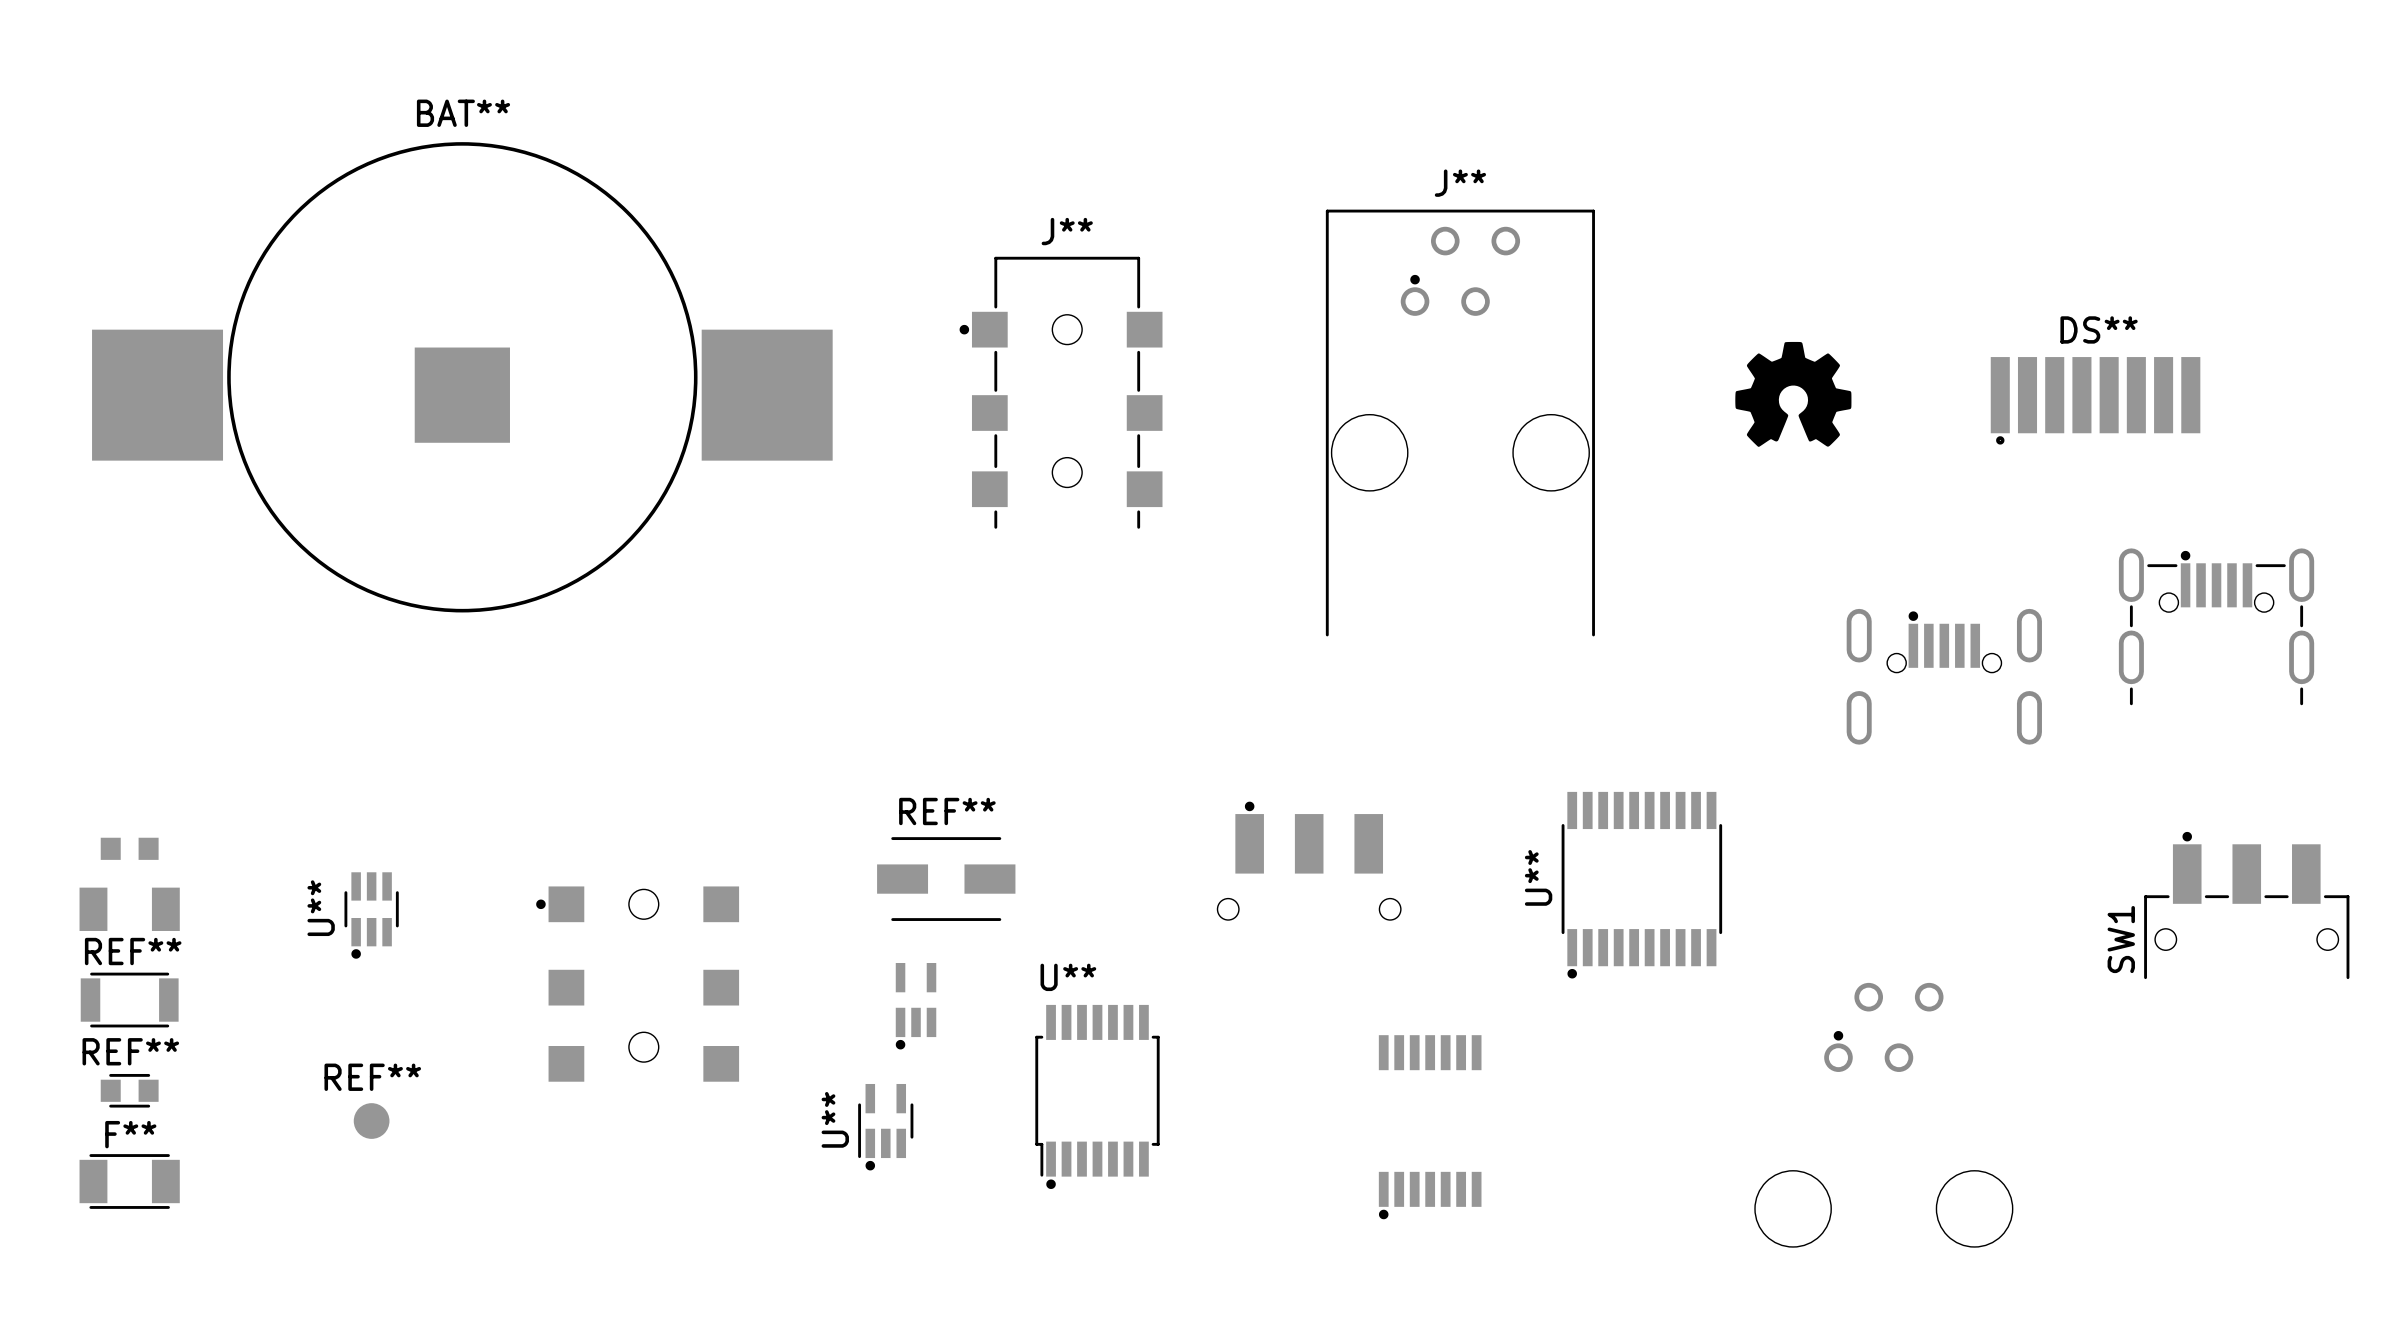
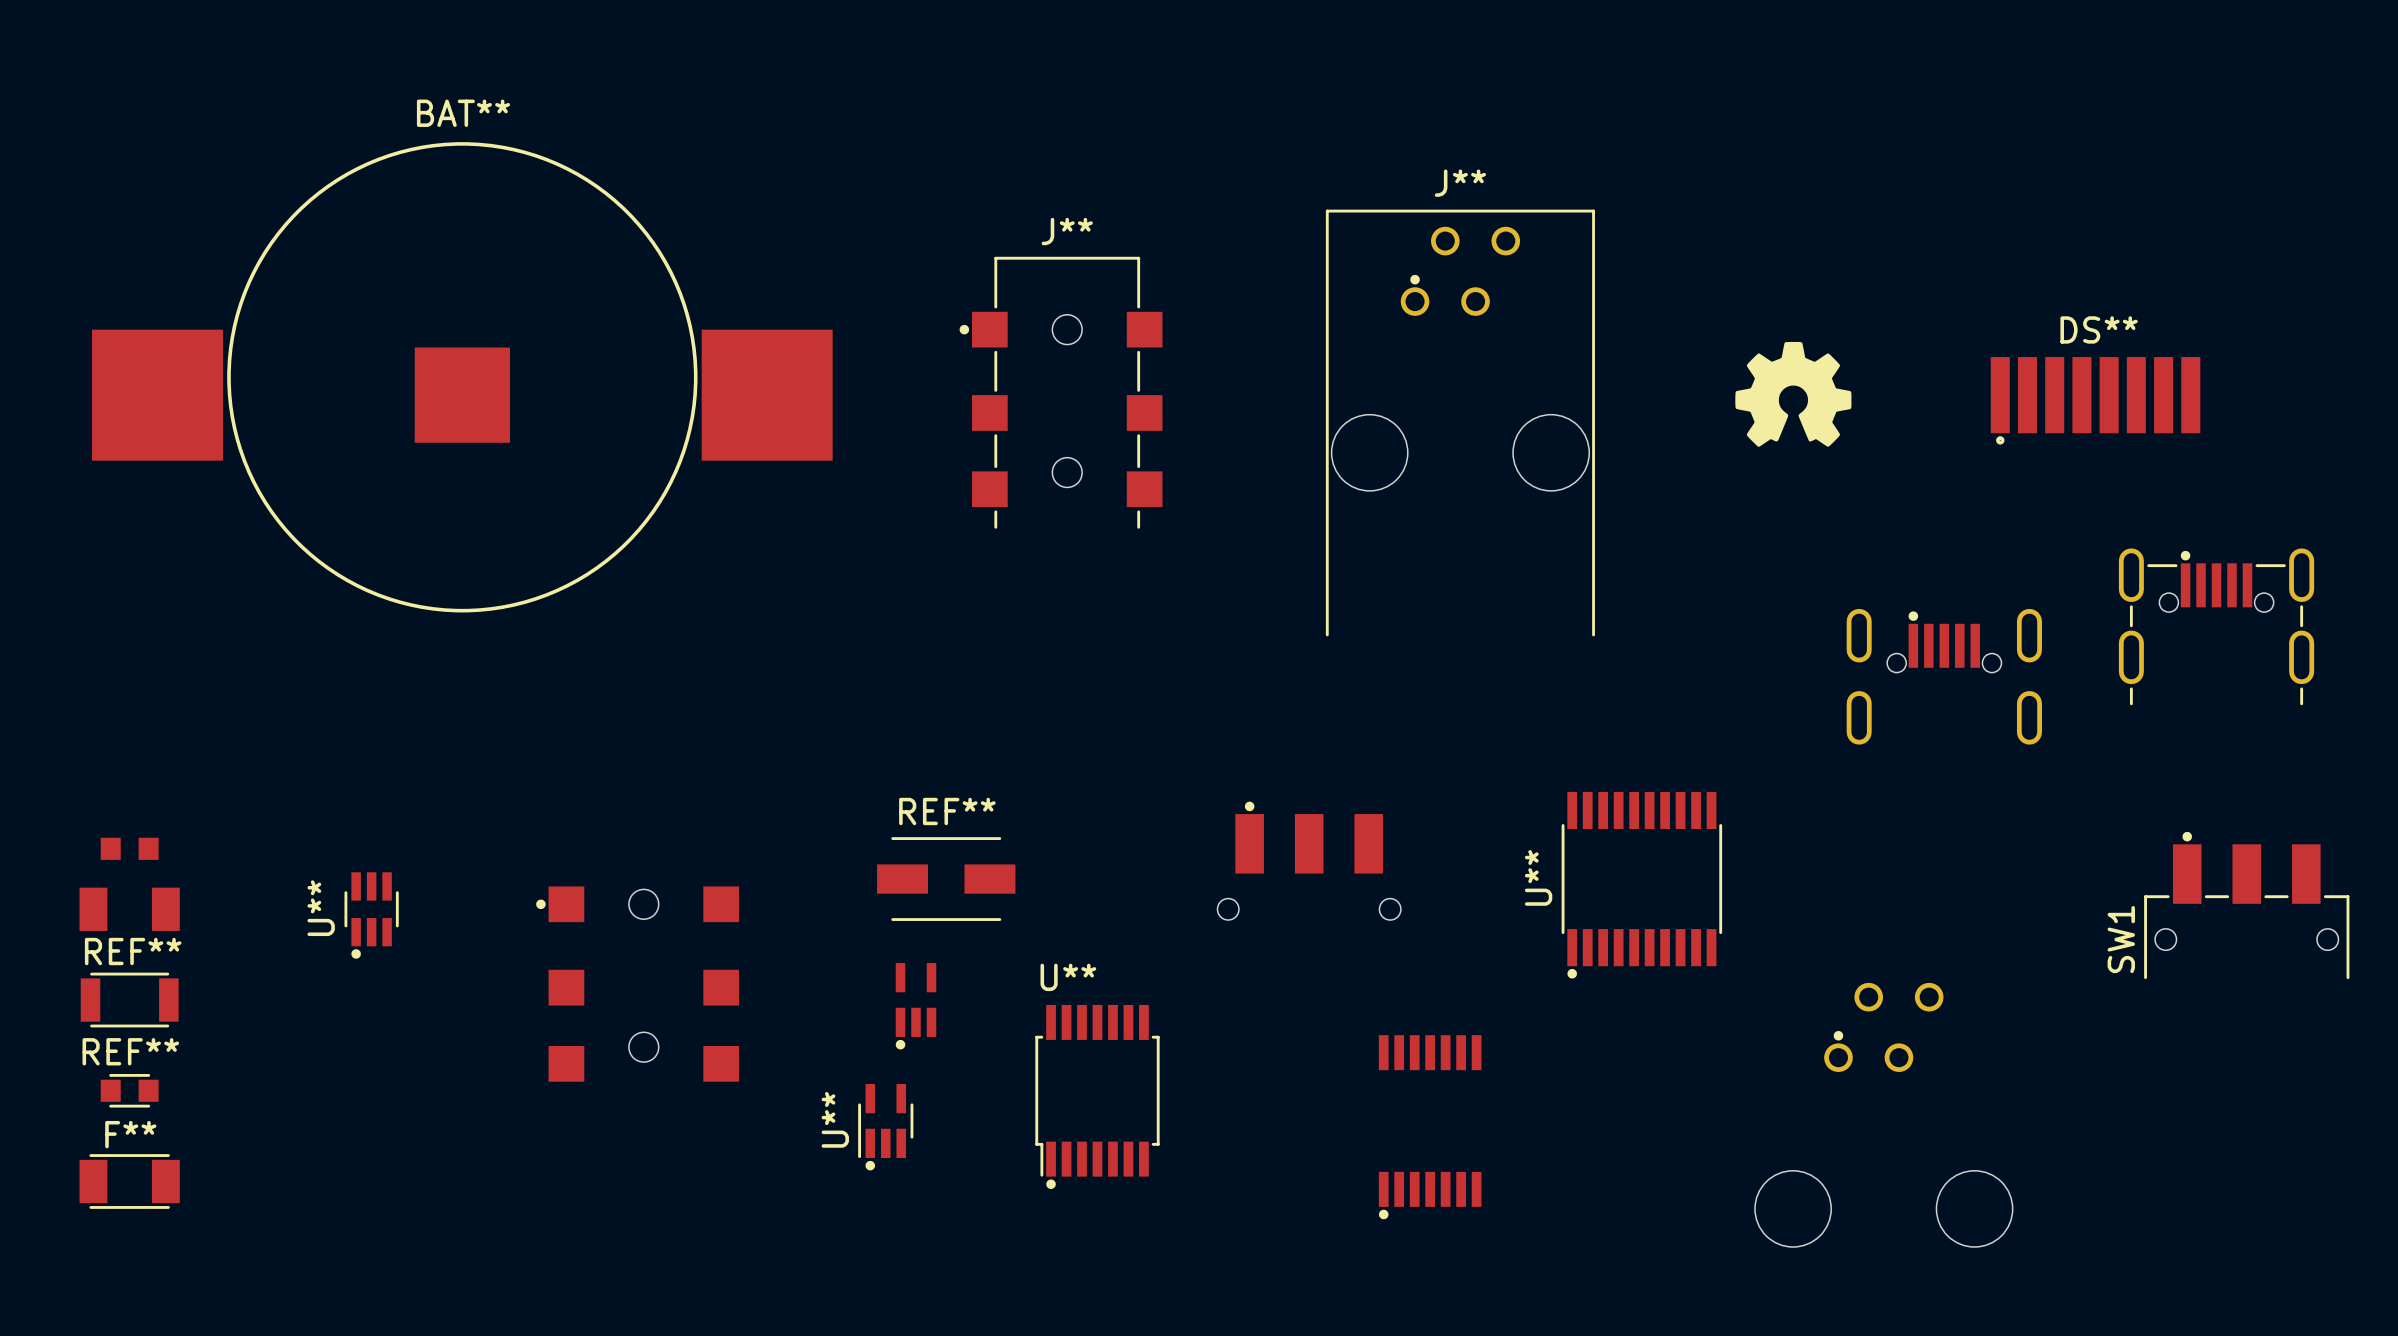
REF**: (371, 1121) -> none

